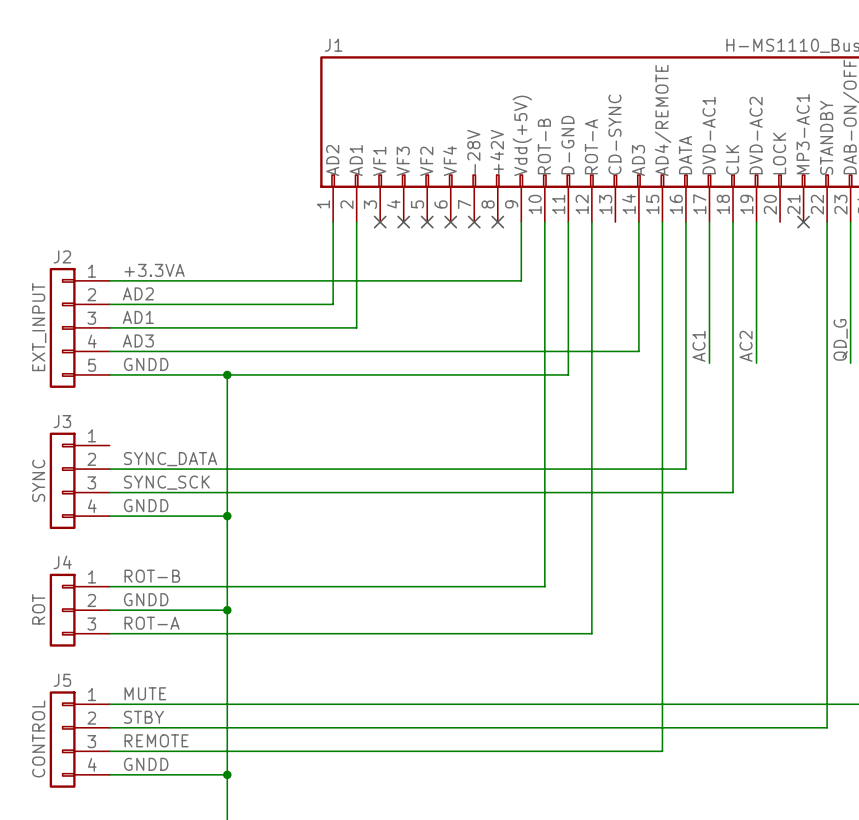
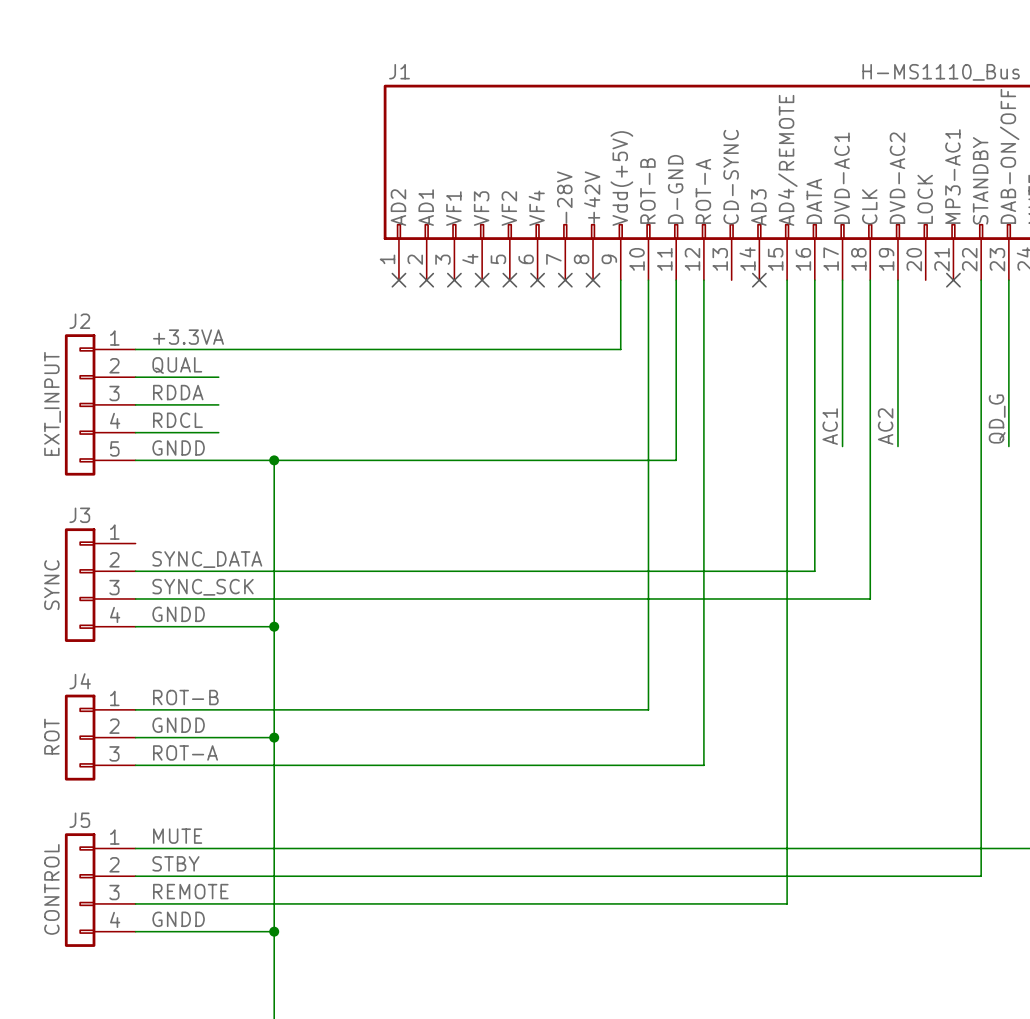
wire: (333, 222) (333, 304) (180, 304) -> none
no-connect mark: none -> (398, 280)
wire: (356, 222) (356, 327) (180, 327) -> none
no-connect mark: none -> (426, 280)
wire: (638, 222) (638, 351) (180, 351) -> none
no-connect mark: none -> (759, 280)
label: AD2 (138, 293) -> QUAL (177, 365)
label: AD1 (138, 317) -> RDDA (178, 392)
label: AD3 (138, 340) -> RDCL (177, 420)

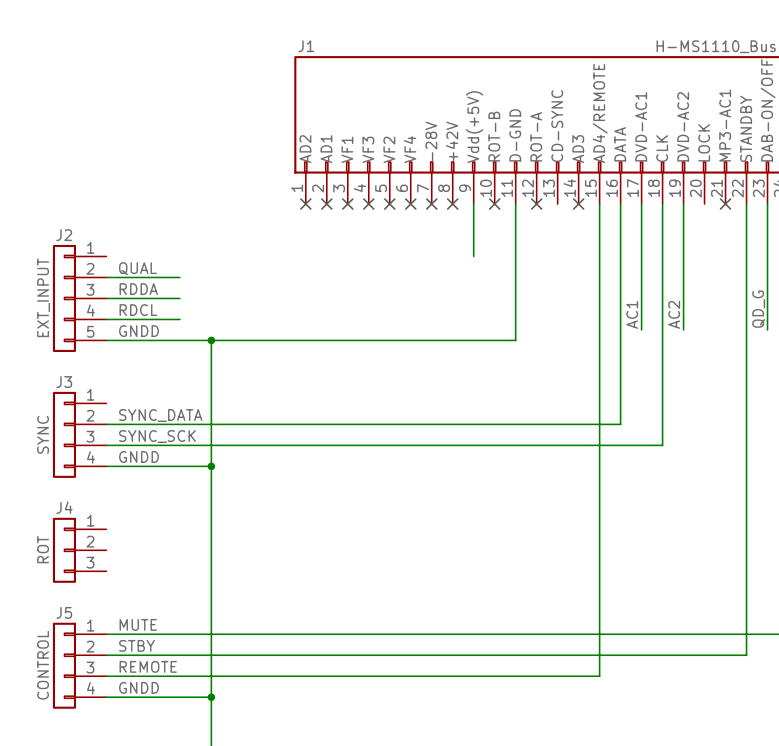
wire: (648, 280) (648, 709) (135, 709) -> none
no-connect mark: none -> (494, 204)
wire: (703, 280) (703, 765) (135, 765) -> none
no-connect mark: none -> (536, 204)
label: +3.3VA (188, 337) -> none
wire: (135, 349) (620, 349) -> none
wire: none -> (169, 277) (179, 277)
wire: none -> (169, 298) (179, 298)
wire: none -> (169, 319) (179, 319)
label: ROT-B (185, 697) -> none
label: GNDD (178, 725) -> none
wire: (135, 737) (274, 737) -> none
junction: (274, 737) -> none
label: ROT-A (185, 752) -> none

